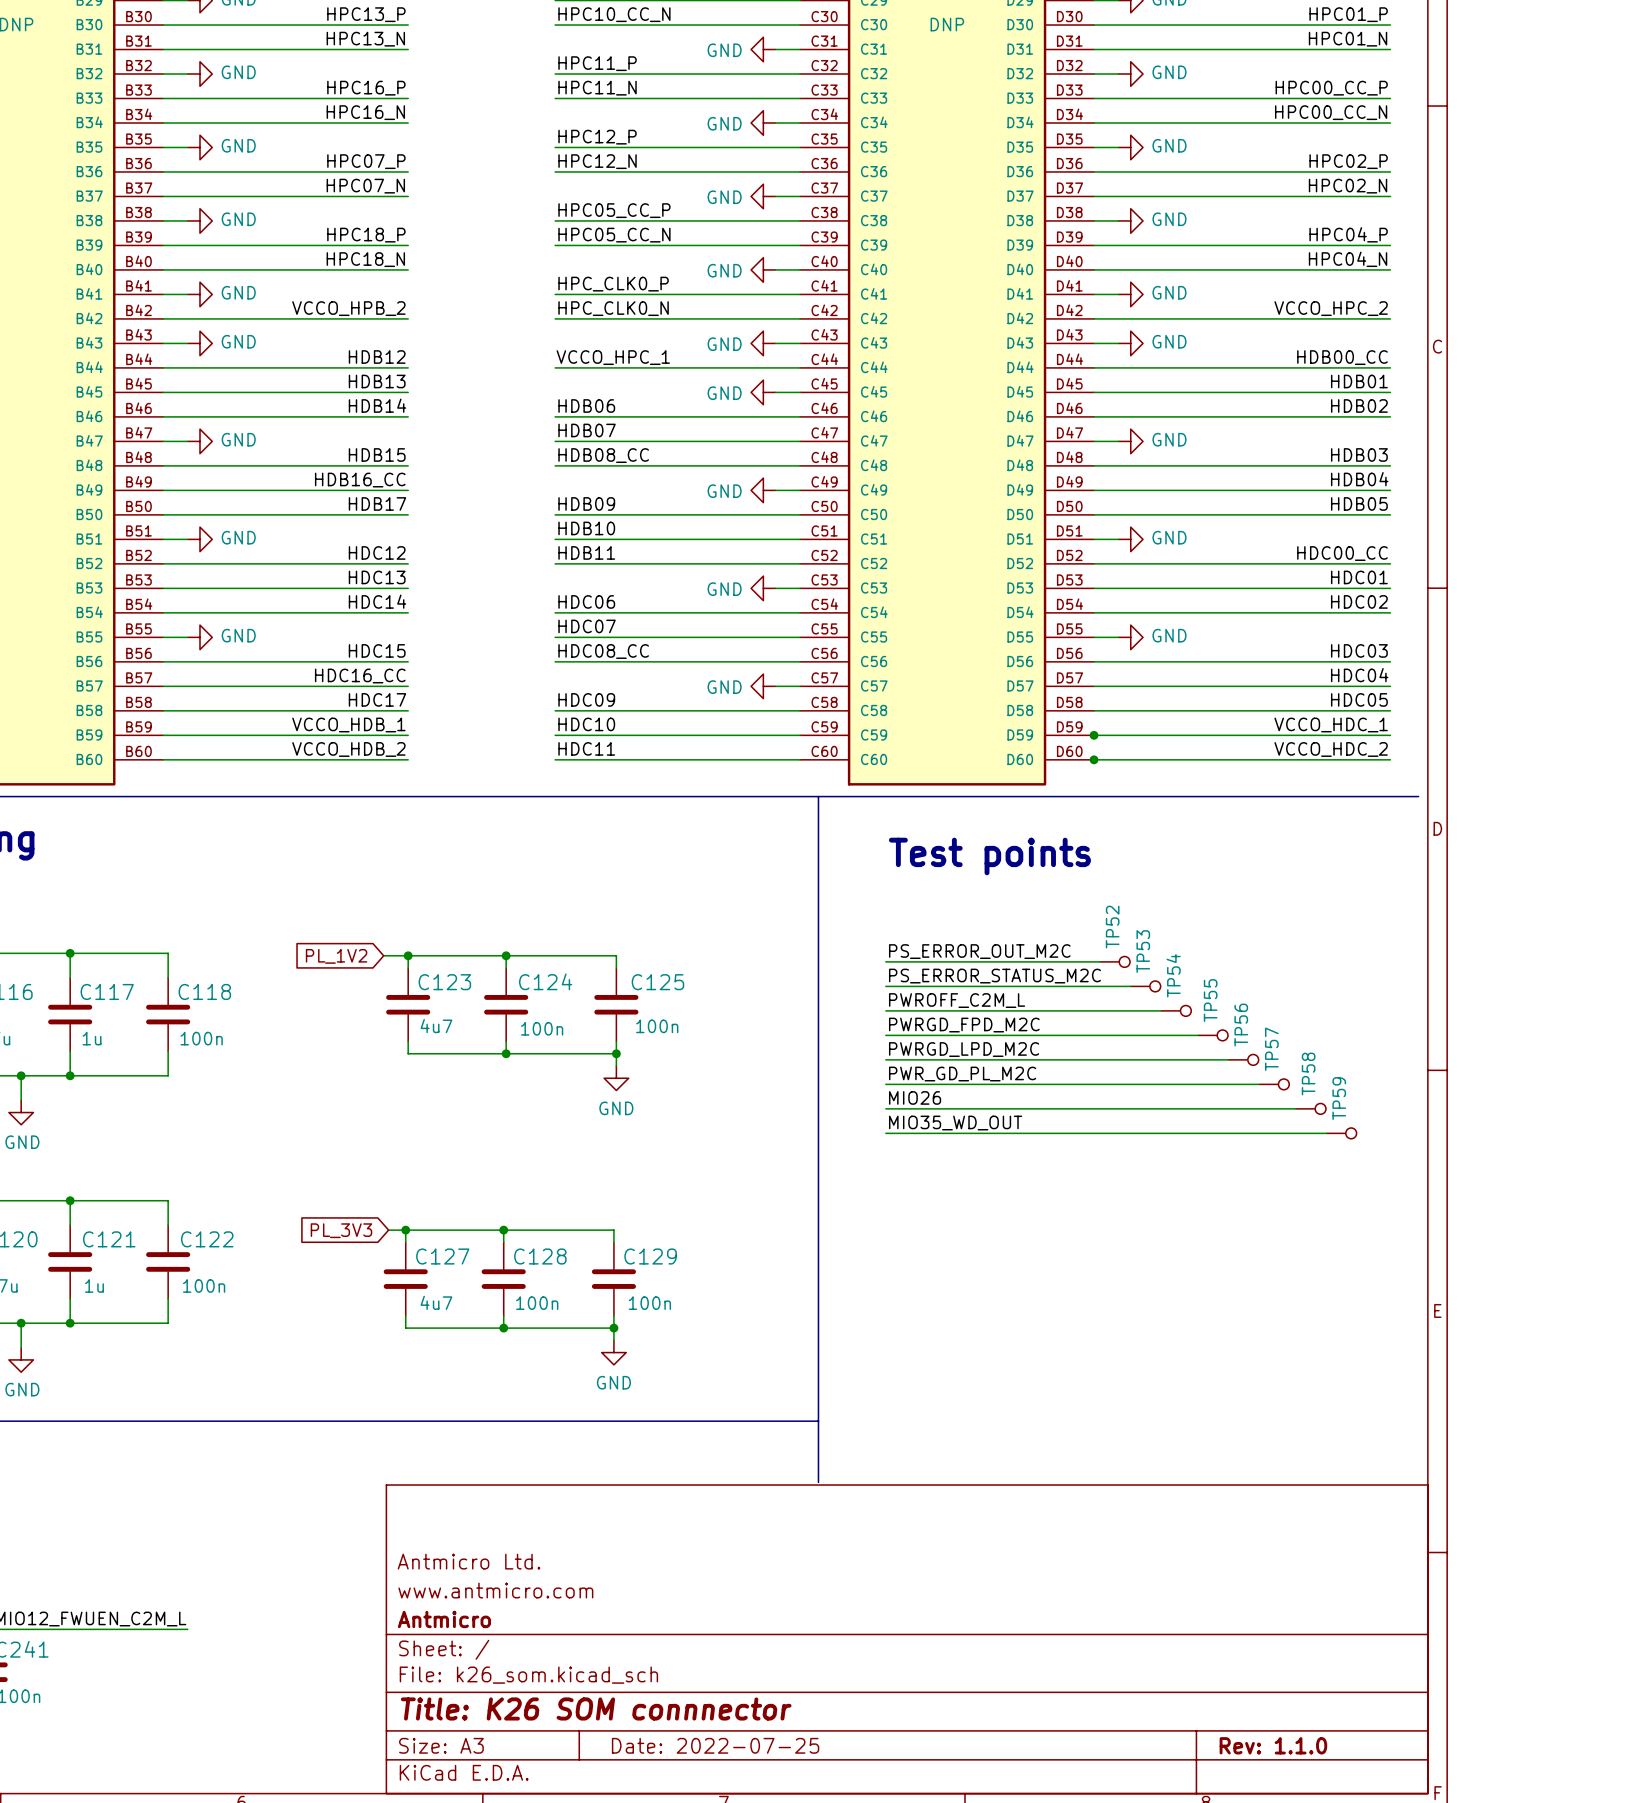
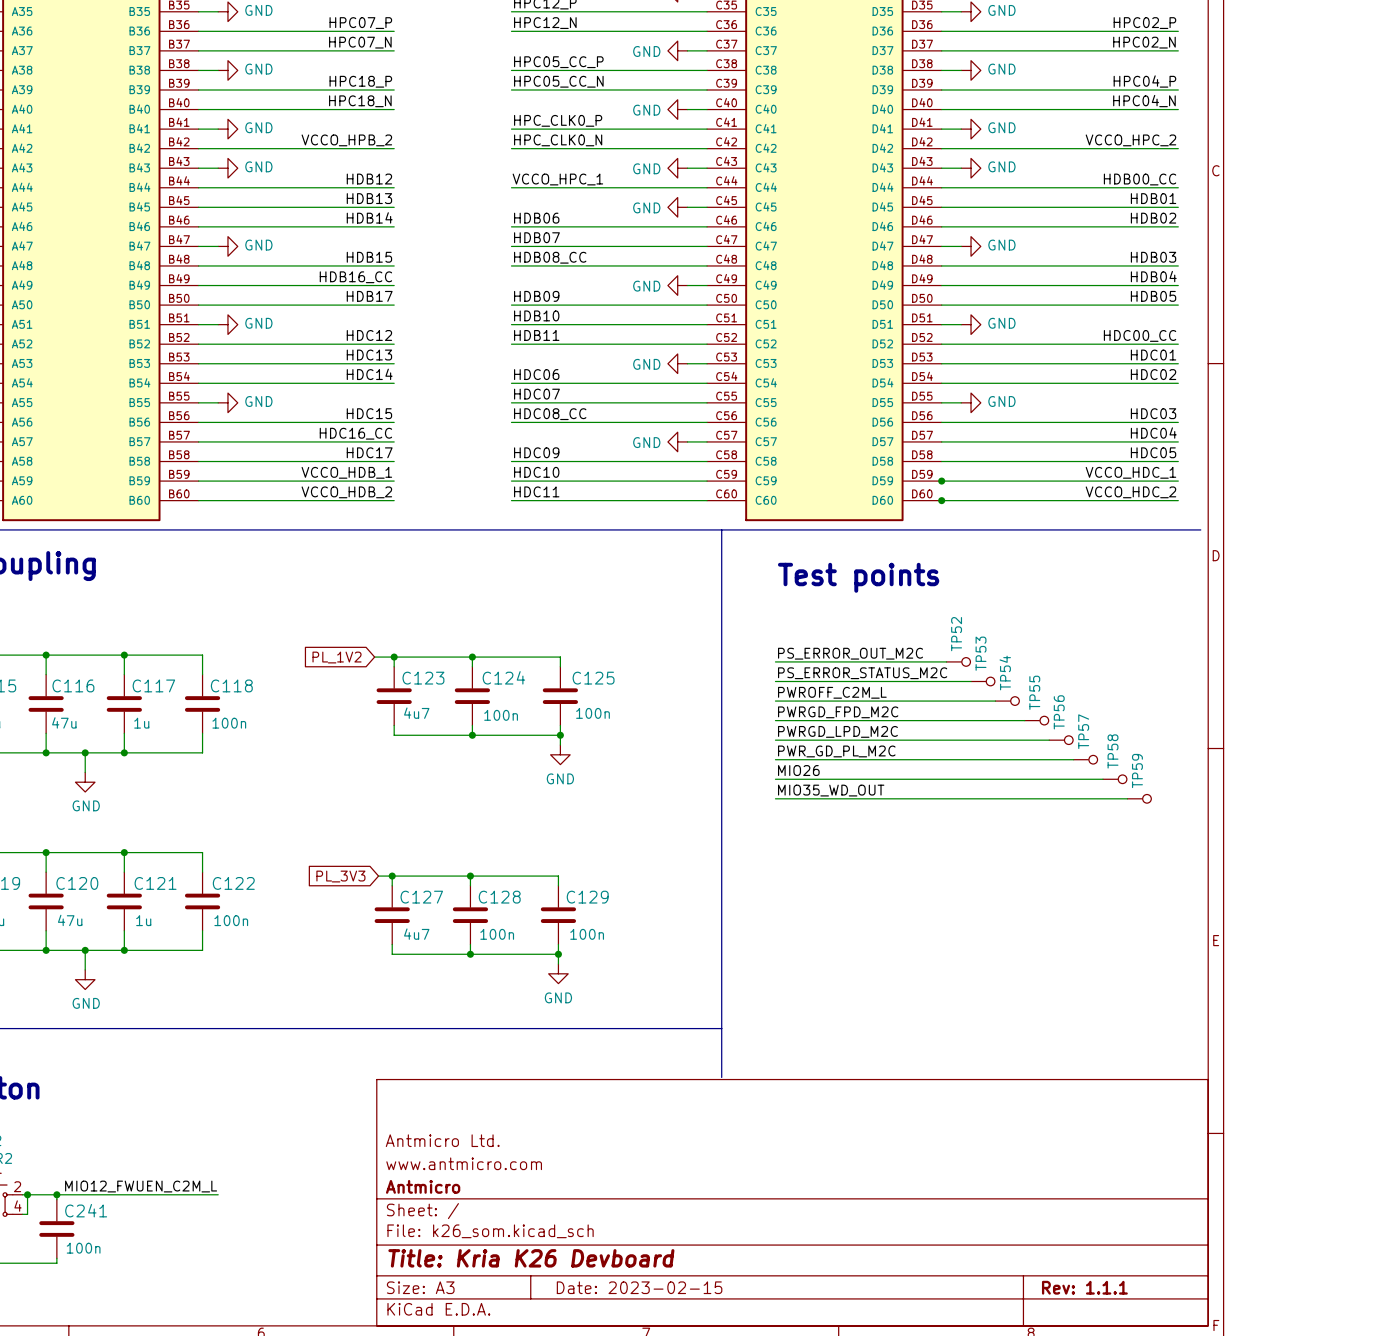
title block: Title: K26 SOM connnector (596, 1708) -> Title: Kria K26 Devboard (531, 1258)
title block: Date: 2022-07-25 (715, 1745) -> Date: 2023-02-15 (639, 1287)
title block: Rev: 1.1.0 (1273, 1745) -> Rev: 1.1.1 (1084, 1287)

